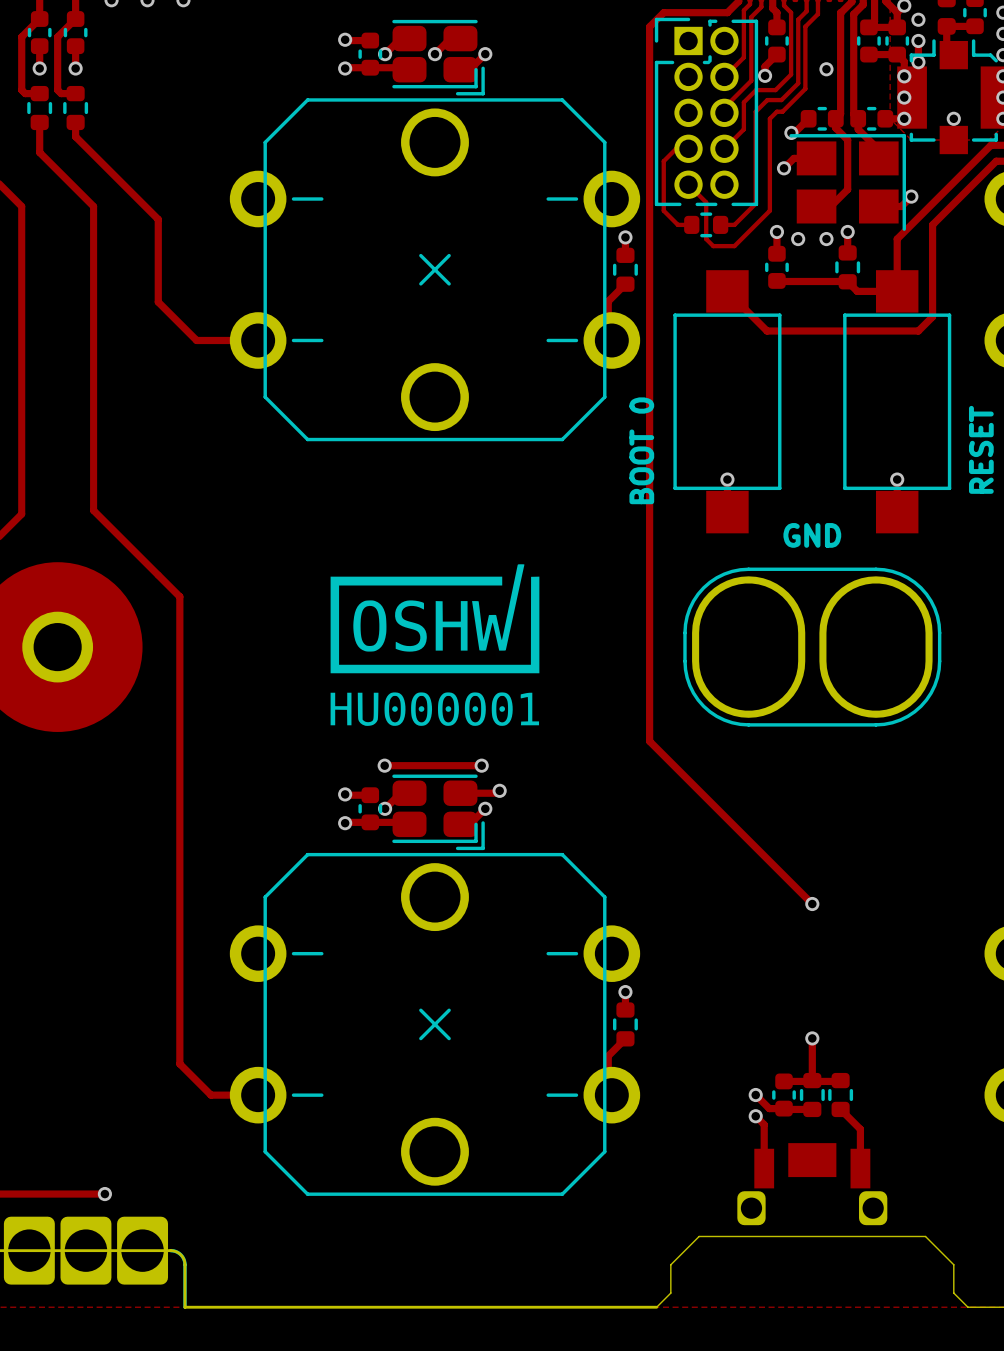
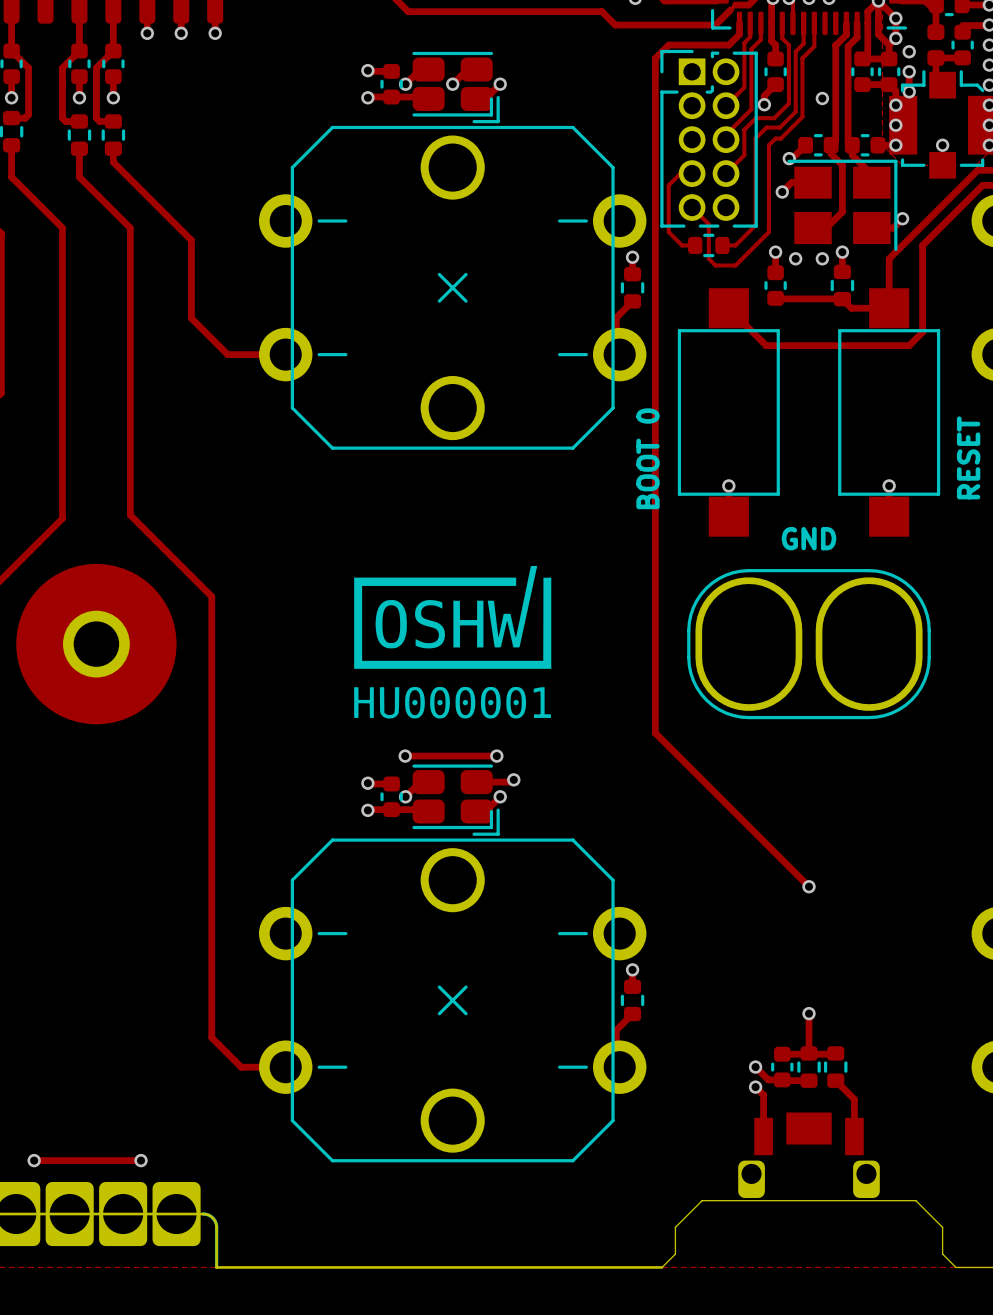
part footprint: [737, 1143, 888, 1226] -> [738, 1112, 880, 1198]

